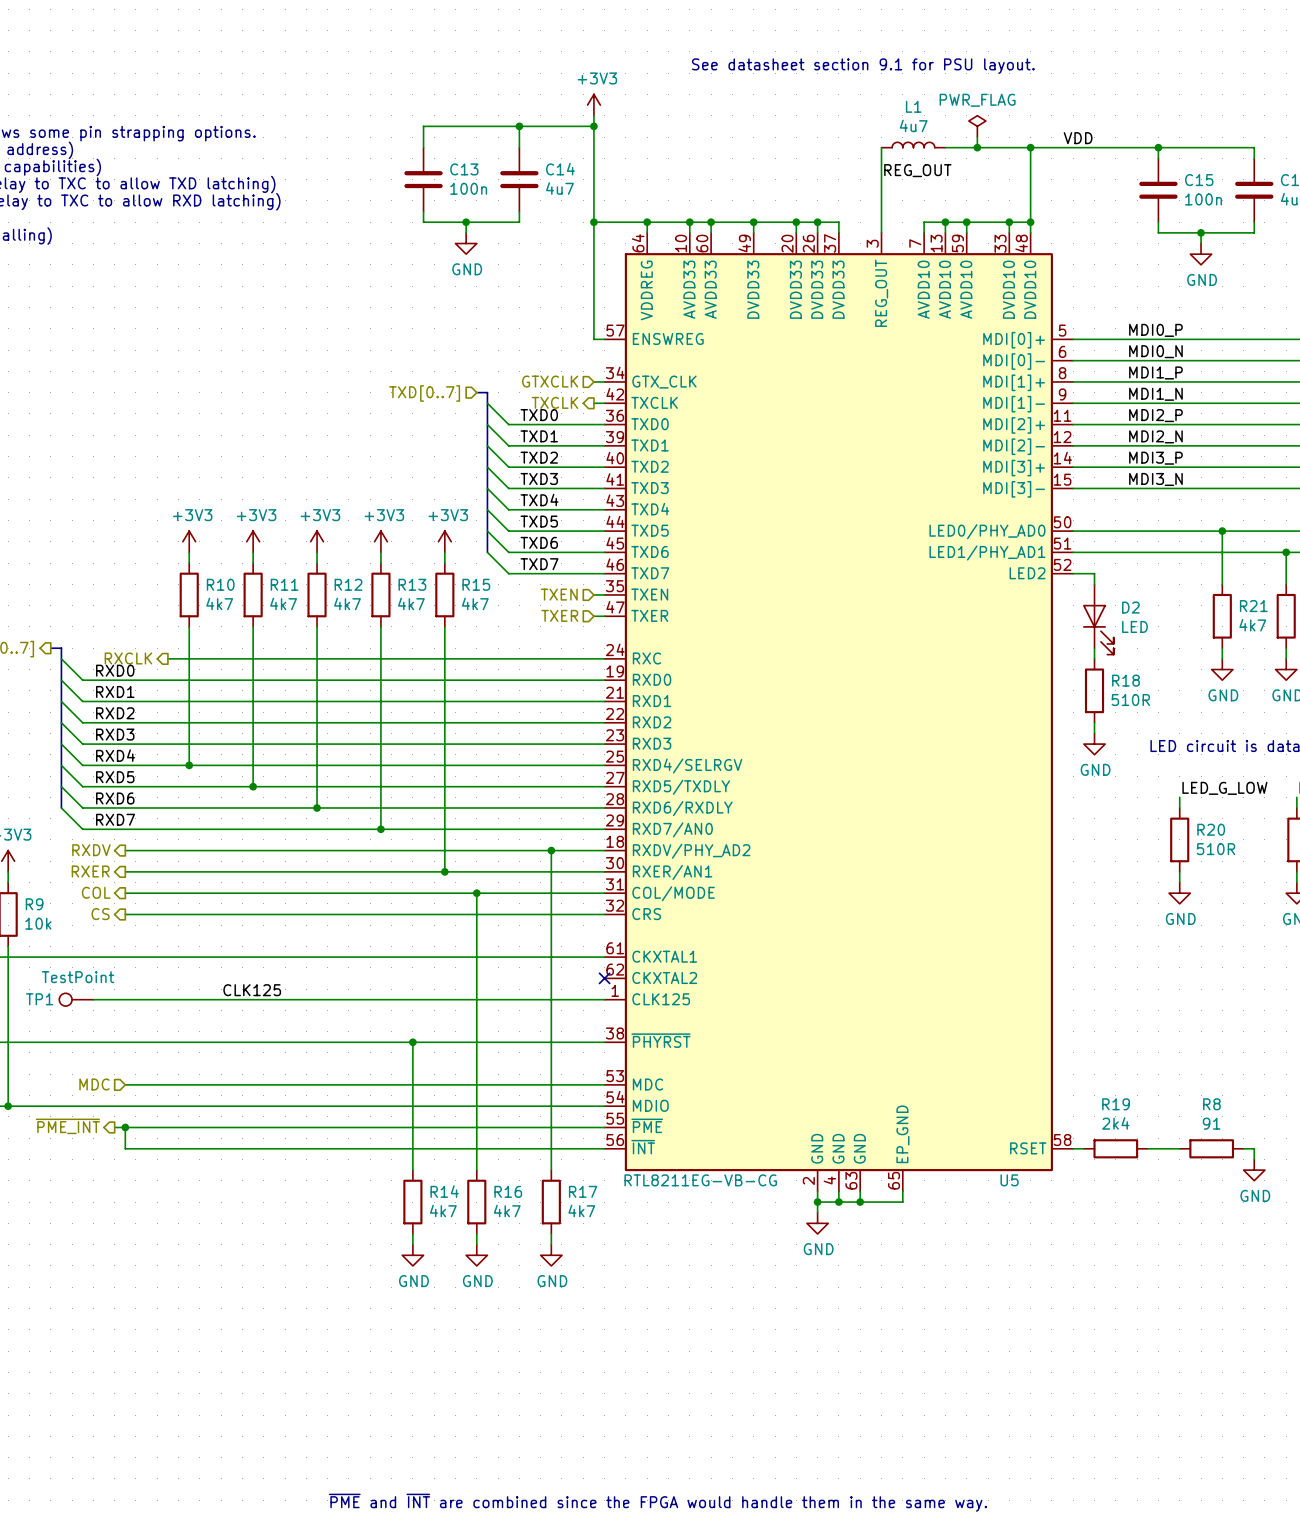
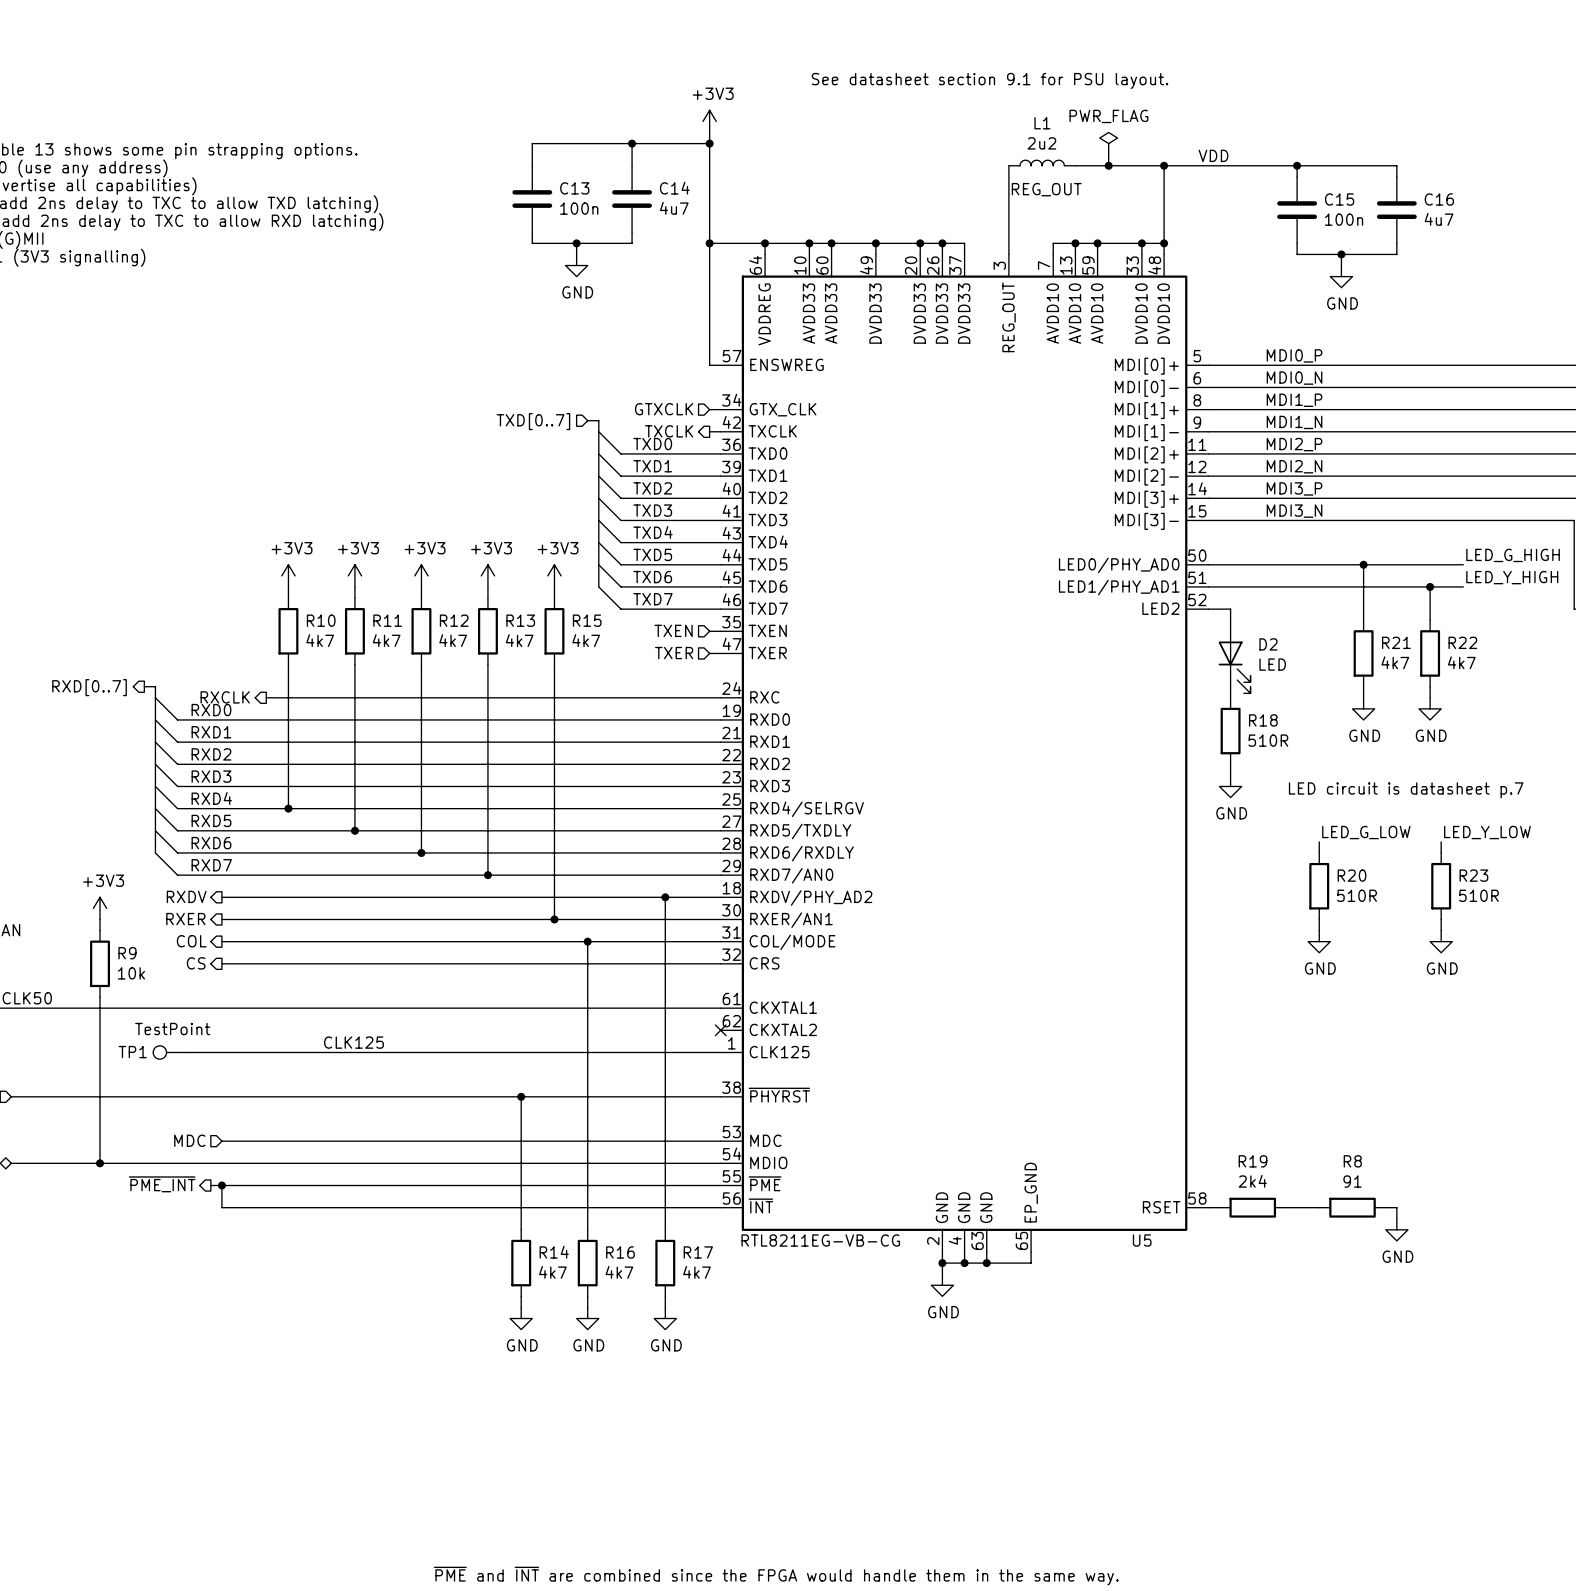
L1 value: 4u7 (913, 125) -> 2u2 (1041, 143)

